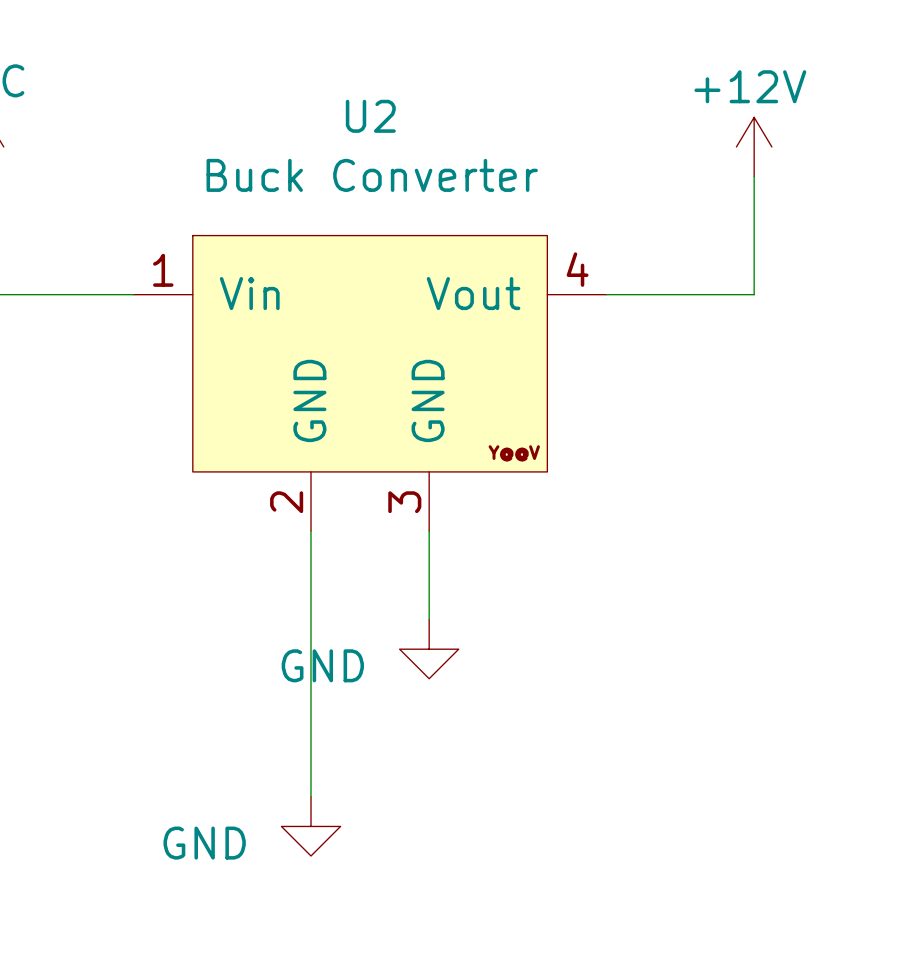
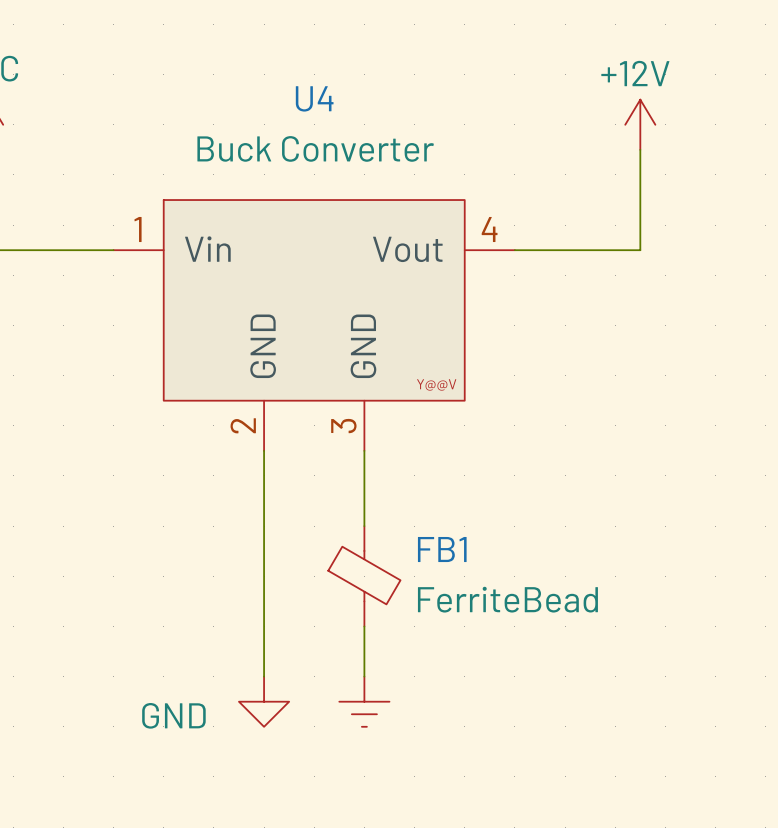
U2 name: U2 (370, 116) -> U4 (314, 98)
power symbol: GND (429, 649) -> none
FB1: none -> FerriteBead (364, 576)
wire: none -> (364, 626) (364, 676)
power symbol: none -> (364, 701)

